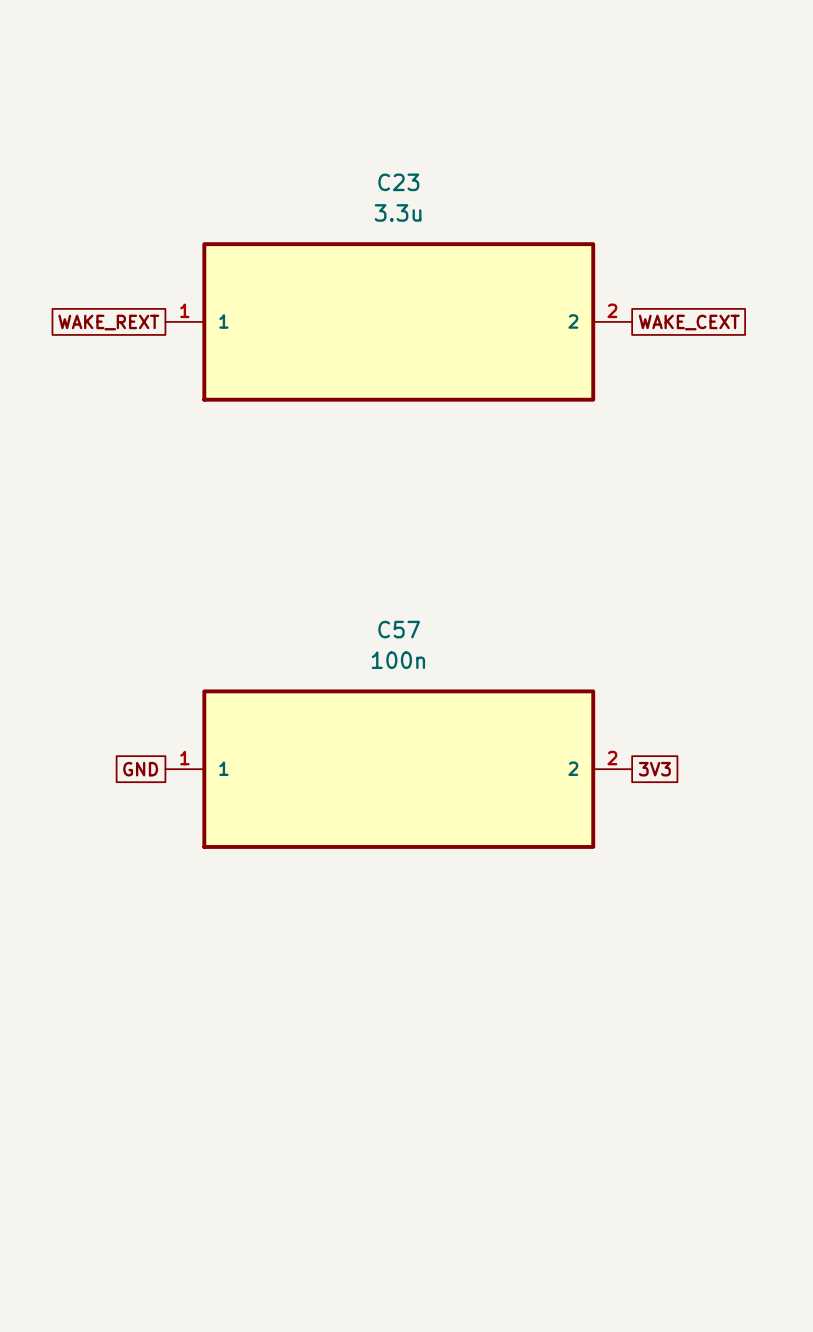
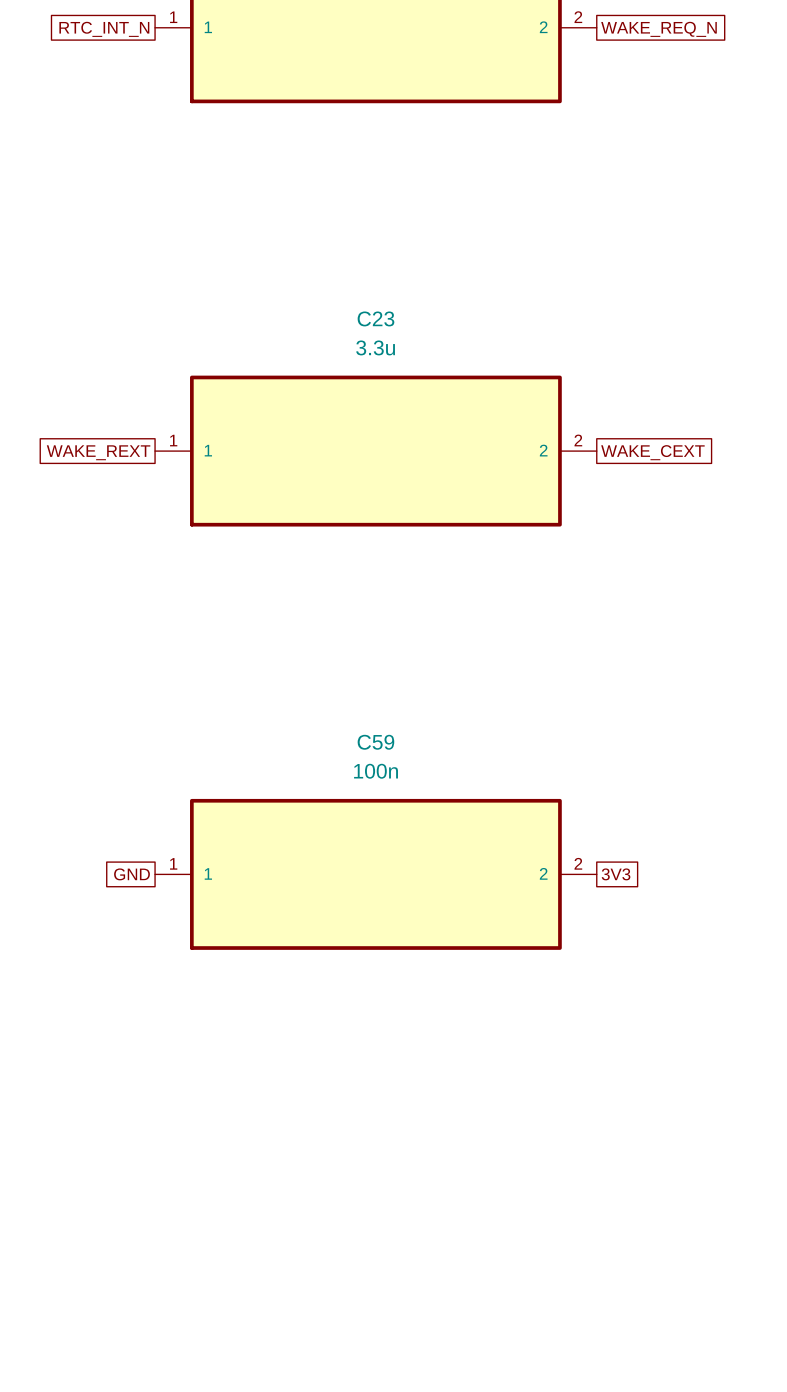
C57 name: C57 (399, 629) -> C59 (375, 742)

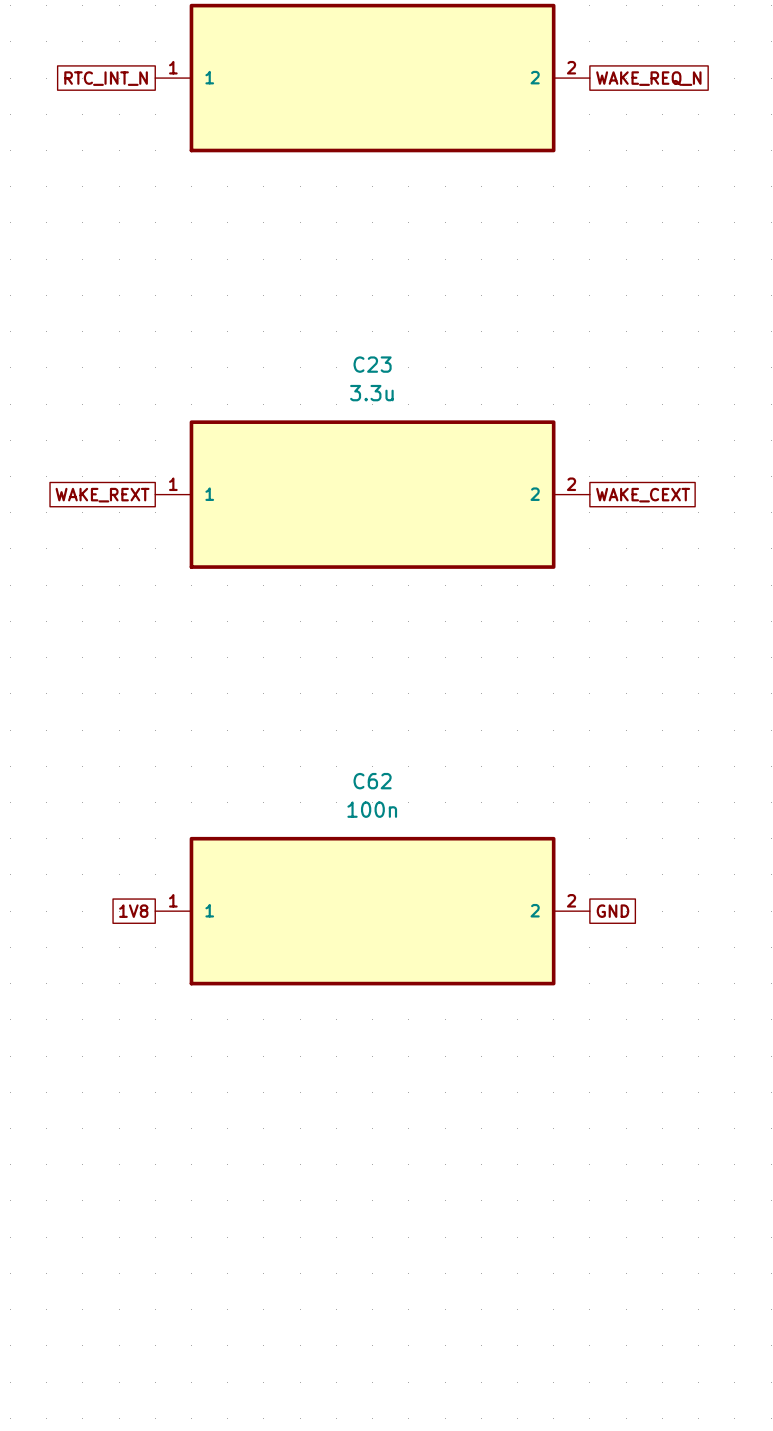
C59 name: C59 (375, 742) -> C62 (372, 781)
global label: GND (131, 874) -> 1V8 (133, 911)
global label: 3V3 (616, 874) -> GND (612, 911)

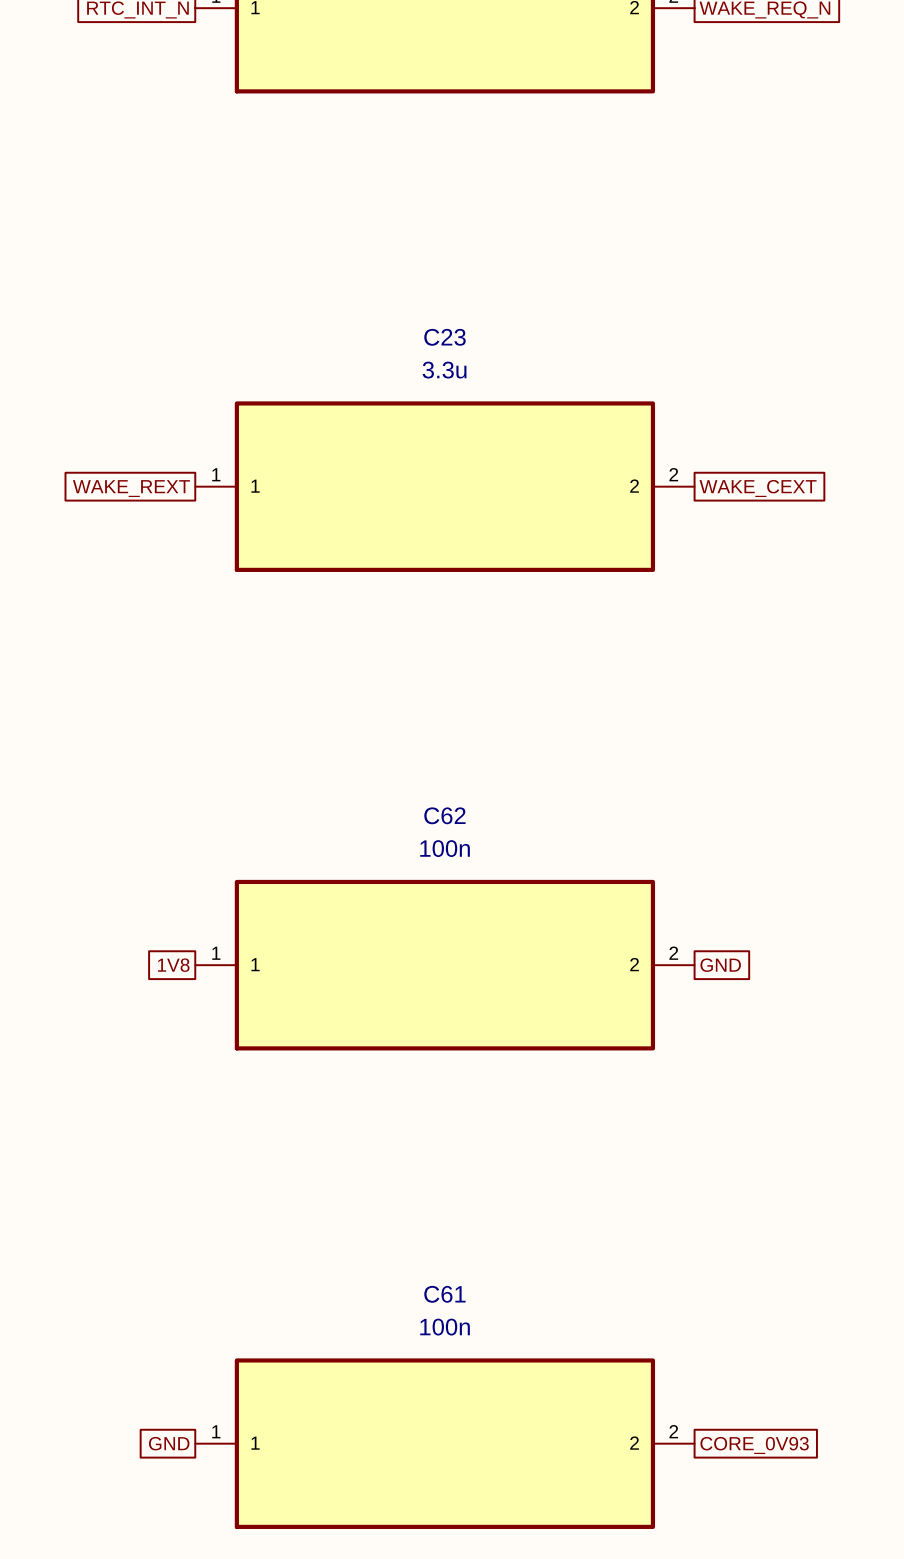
global label: none -> GND (169, 1443)
C61: none -> 100n (444, 1443)
global label: none -> CORE_0V93 (754, 1445)

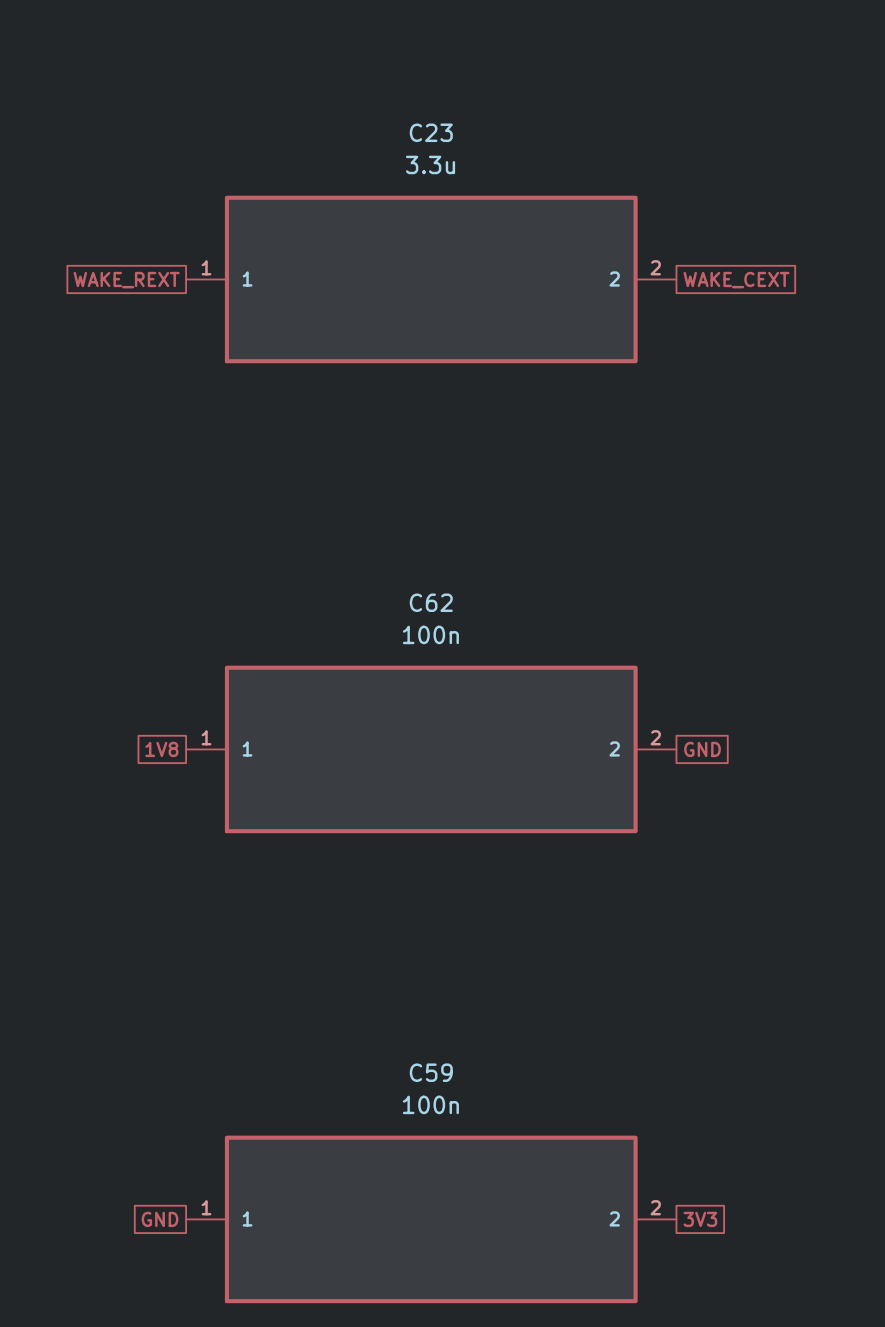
C61 name: C61 (444, 1294) -> C59 (431, 1072)
global label: CORE_0V93 (754, 1445) -> 3V3 (700, 1219)

